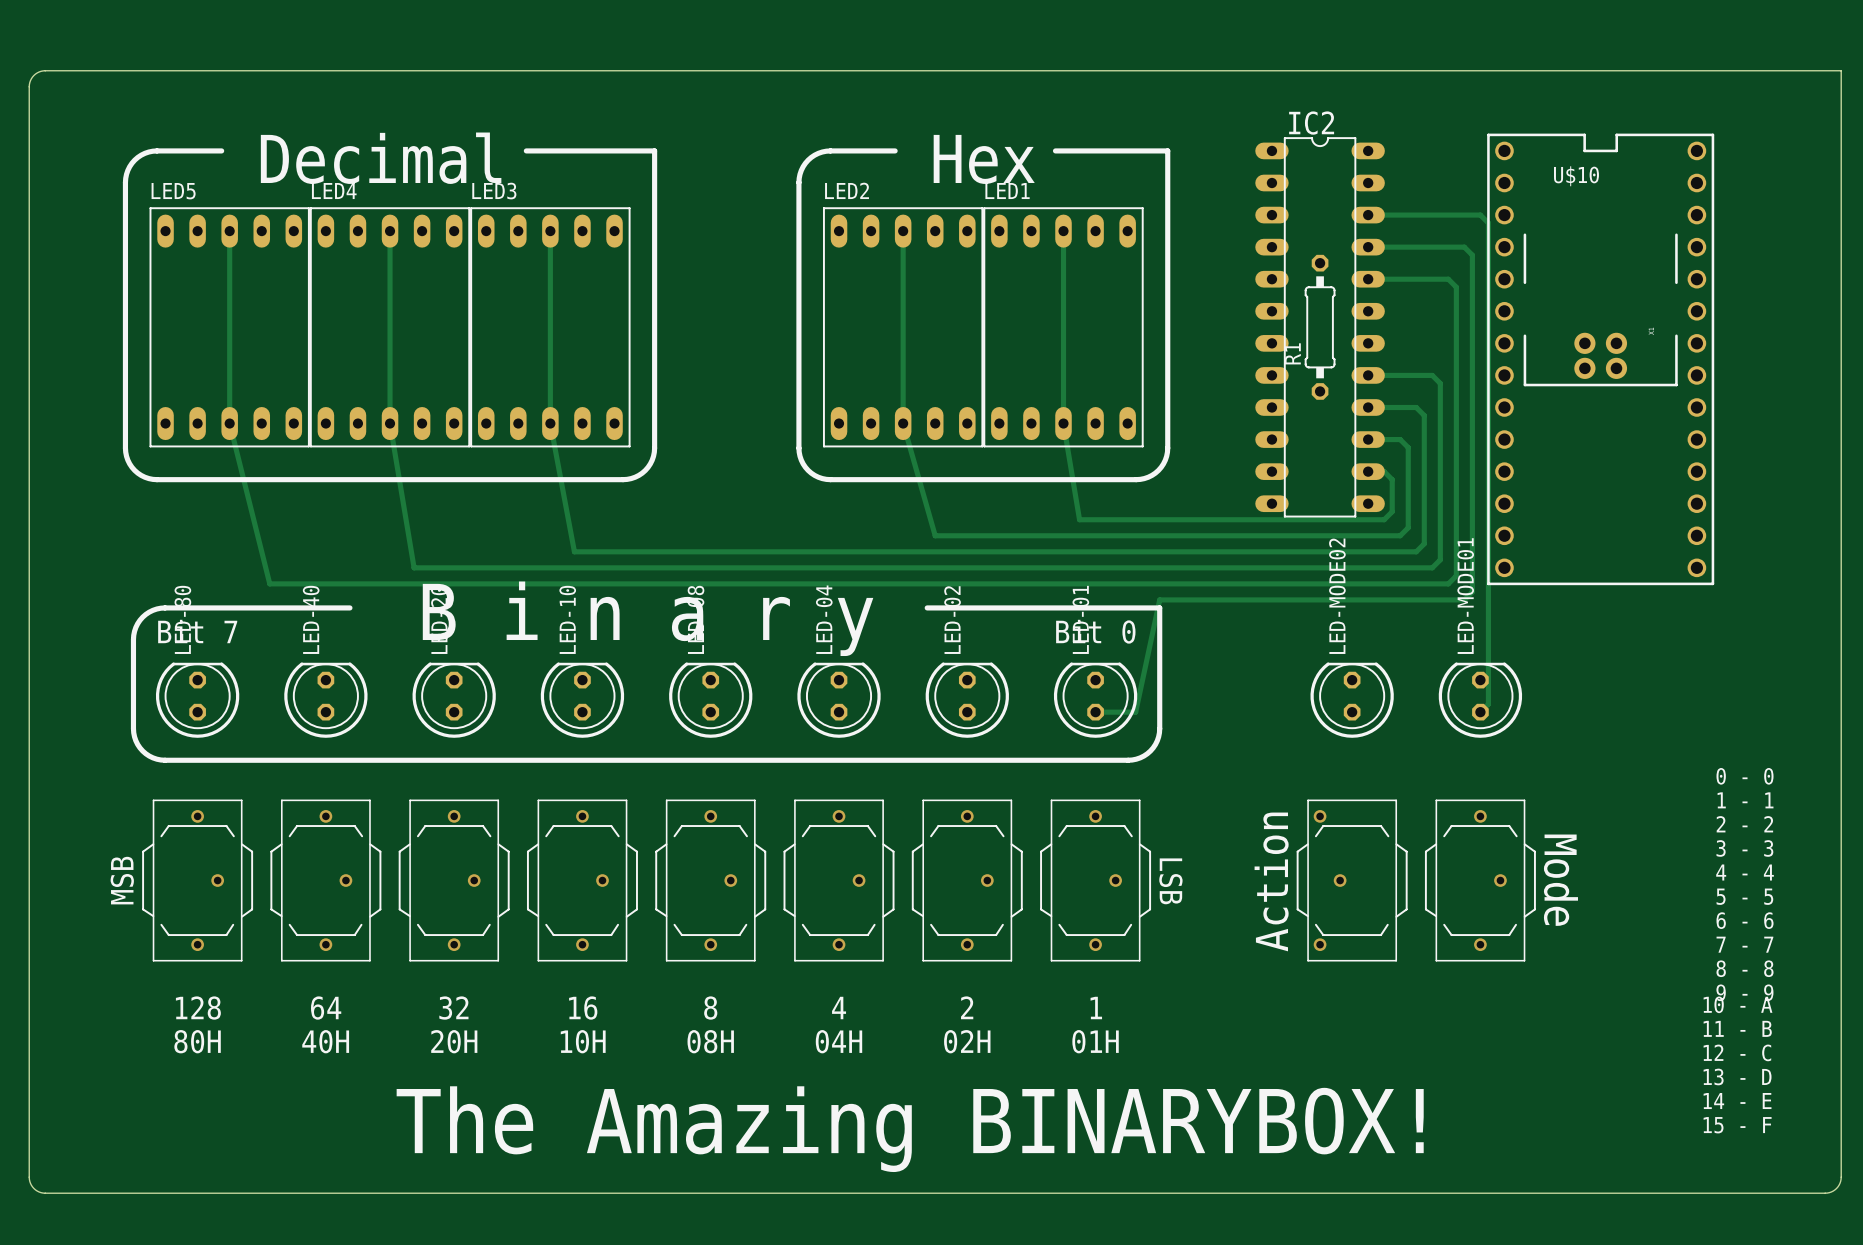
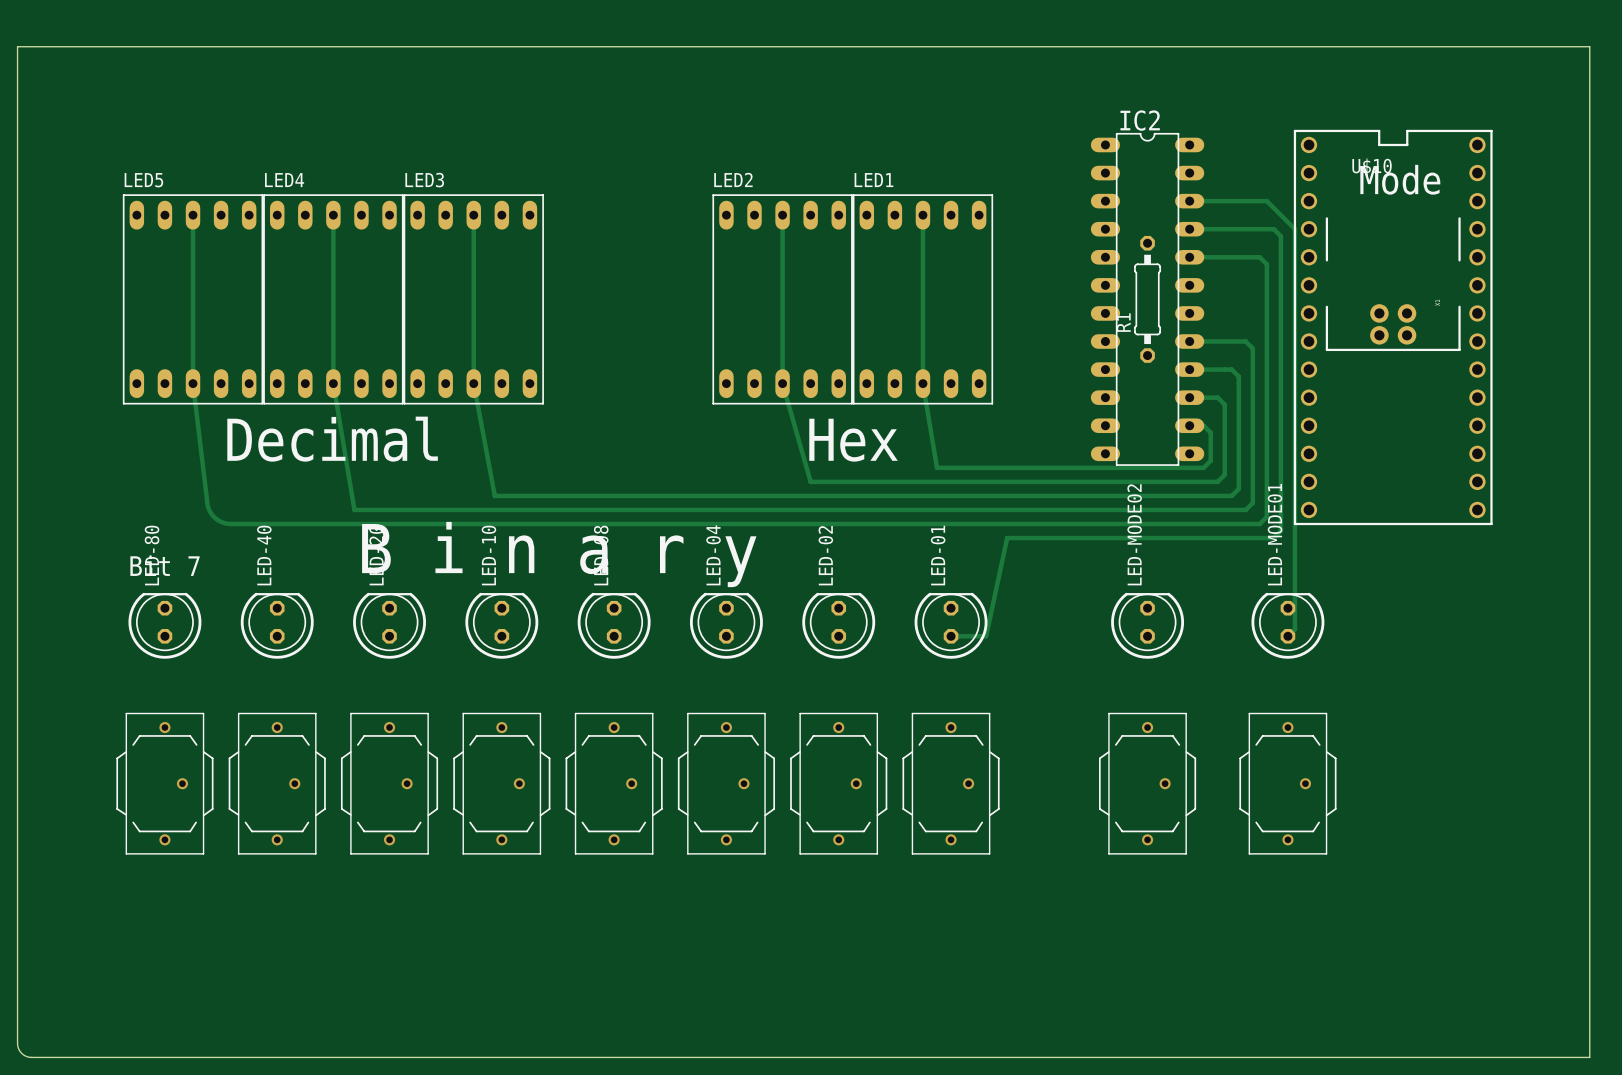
board edge: (29, 86) (33, 75) (45, 70) (1841, 70) (1841, 1177) (1836, 1188) (1825, 1193) -> (17, 88) (17, 46) (1589, 46) (1589, 1057)
line: (221, 150) (148, 152) (134, 160) (126, 174) (125, 448) (129, 463) (137, 473) (144, 477) (157, 479) (631, 478) (645, 470) (650, 463) (654, 452) (654, 150) (526, 150) -> none
line: (895, 150) (822, 152) (808, 160) (800, 174) (798, 448) (801, 460) (805, 467) (814, 475) (830, 479) (1144, 478) (1158, 470) (1163, 463) (1167, 452) (1167, 150) (1055, 150) -> none
text: Decimal (381, 158) -> none
text: Hex (984, 159) -> none
text: none -> Mode (1400, 179)
track: (1456, 215) (1480, 215) (1488, 223) (1488, 247) -> (1266, 201) (1294, 229)
track: (229, 423) (269, 583) (272, 583) -> (193, 383) (207, 506) (216, 519) (230, 524)
text: none -> Decimal (332, 439)
text: none -> Hex (853, 440)
line: (349, 607) (165, 607) (149, 612) (137, 623) (133, 635) (133, 728) (137, 744) (149, 756) (165, 760) (1128, 760) (1143, 756) (1155, 744) (1159, 728) (1159, 607) (927, 607) -> none
text: Bit 0 (1095, 631) -> none
LED-MODE02 position: (1352, 700) -> (1147, 625)
text: 0 - 0 (1745, 776) -> none
text: 1 - 1 (1745, 800) -> none
text: 2 - 2 (1744, 824) -> none
text: 3 - 3 (1744, 848) -> none
text: 4 - 4 (1745, 872) -> none
text: MSB (122, 880) -> none
part position: (1352, 880) -> (1147, 783)
text: Mode (1560, 880) -> none
text: LSB (1170, 881) -> none
text: Action (1271, 881) -> none
text: 5 - 5 (1744, 896) -> none
text: 6 - 6 (1745, 920) -> none
text: 7 - 7 (1744, 944) -> none
text: 8 - 8 (1745, 968) -> none
text: 9 - 9 (1744, 992) -> none
text: 10 - A (1738, 1004) -> none
text: 2 (967, 1007) -> none
text: 128 (198, 1008) -> none
text: 64 (326, 1008) -> none
text: 32 (453, 1008) -> none
text: 16 (583, 1008) -> none
text: 8 (710, 1008) -> none
text: 4 (839, 1008) -> none
text: 1 (1096, 1008) -> none
text: 11 - B (1737, 1028) -> none
text: 80H (197, 1041) -> none
text: 40H (325, 1041) -> none
text: 20H (454, 1041) -> none
text: 10H (583, 1041) -> none
text: 08H (710, 1041) -> none
text: 04H (838, 1041) -> none
text: 02H (967, 1041) -> none
text: 01H (1095, 1041) -> none
text: 12 - C (1737, 1052) -> none
text: 13 - D (1737, 1076) -> none
text: 14 - E (1737, 1101) -> none
text: 15 - F (1737, 1125) -> none
text: The Amazing BINARYBOX! (910, 1129) -> none

